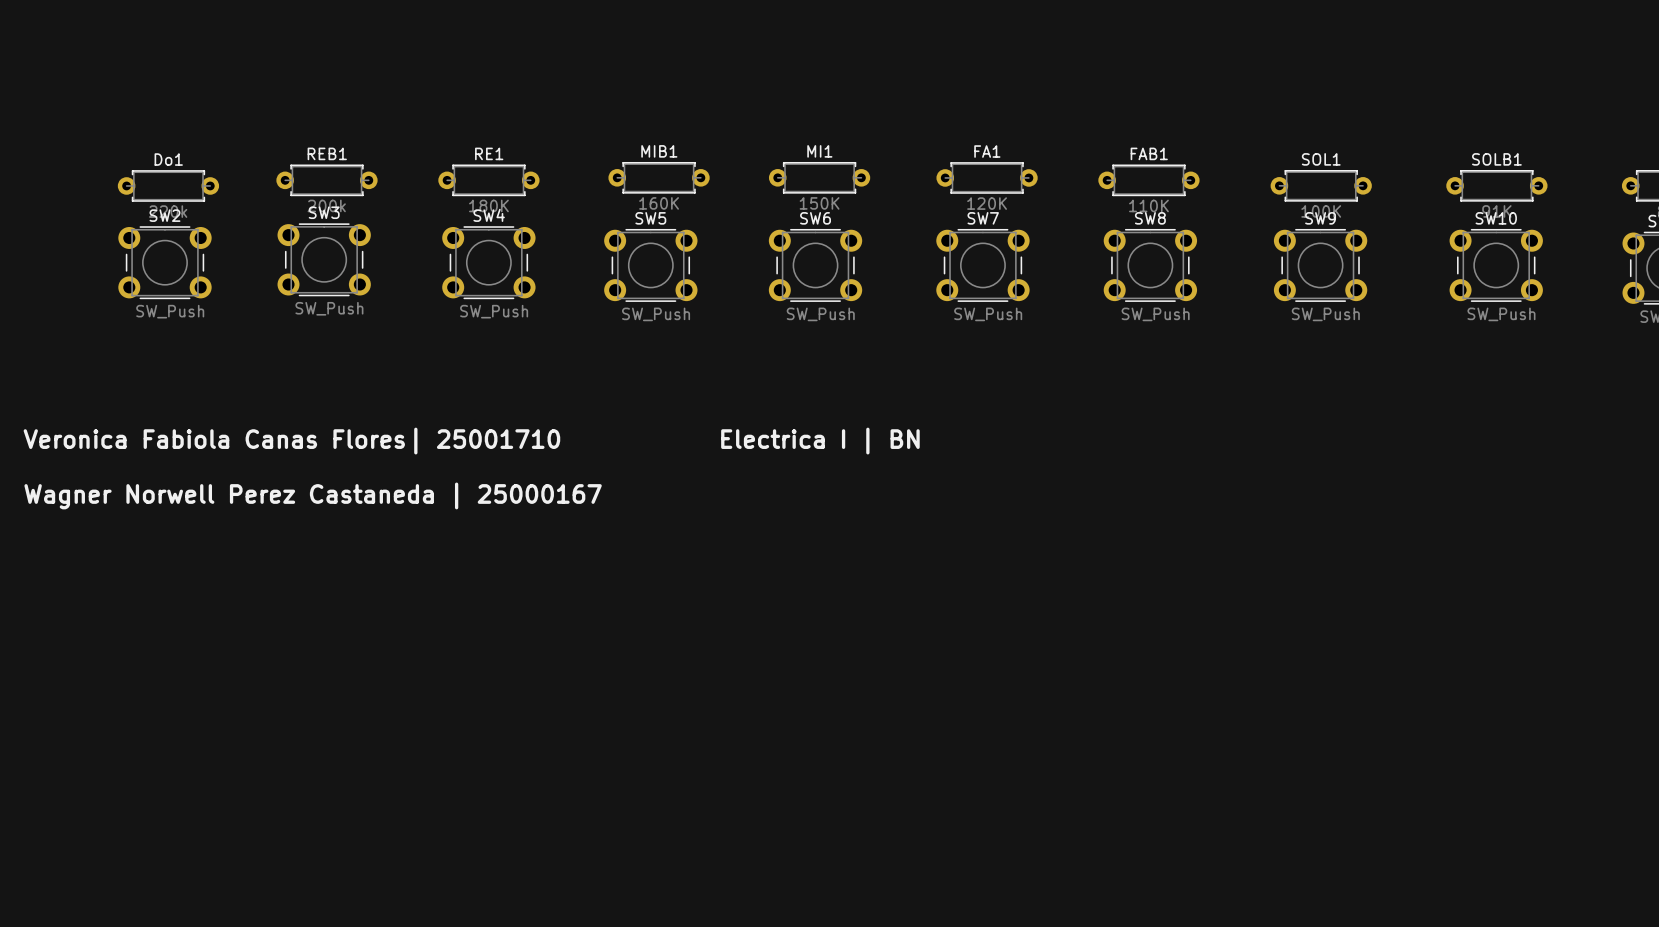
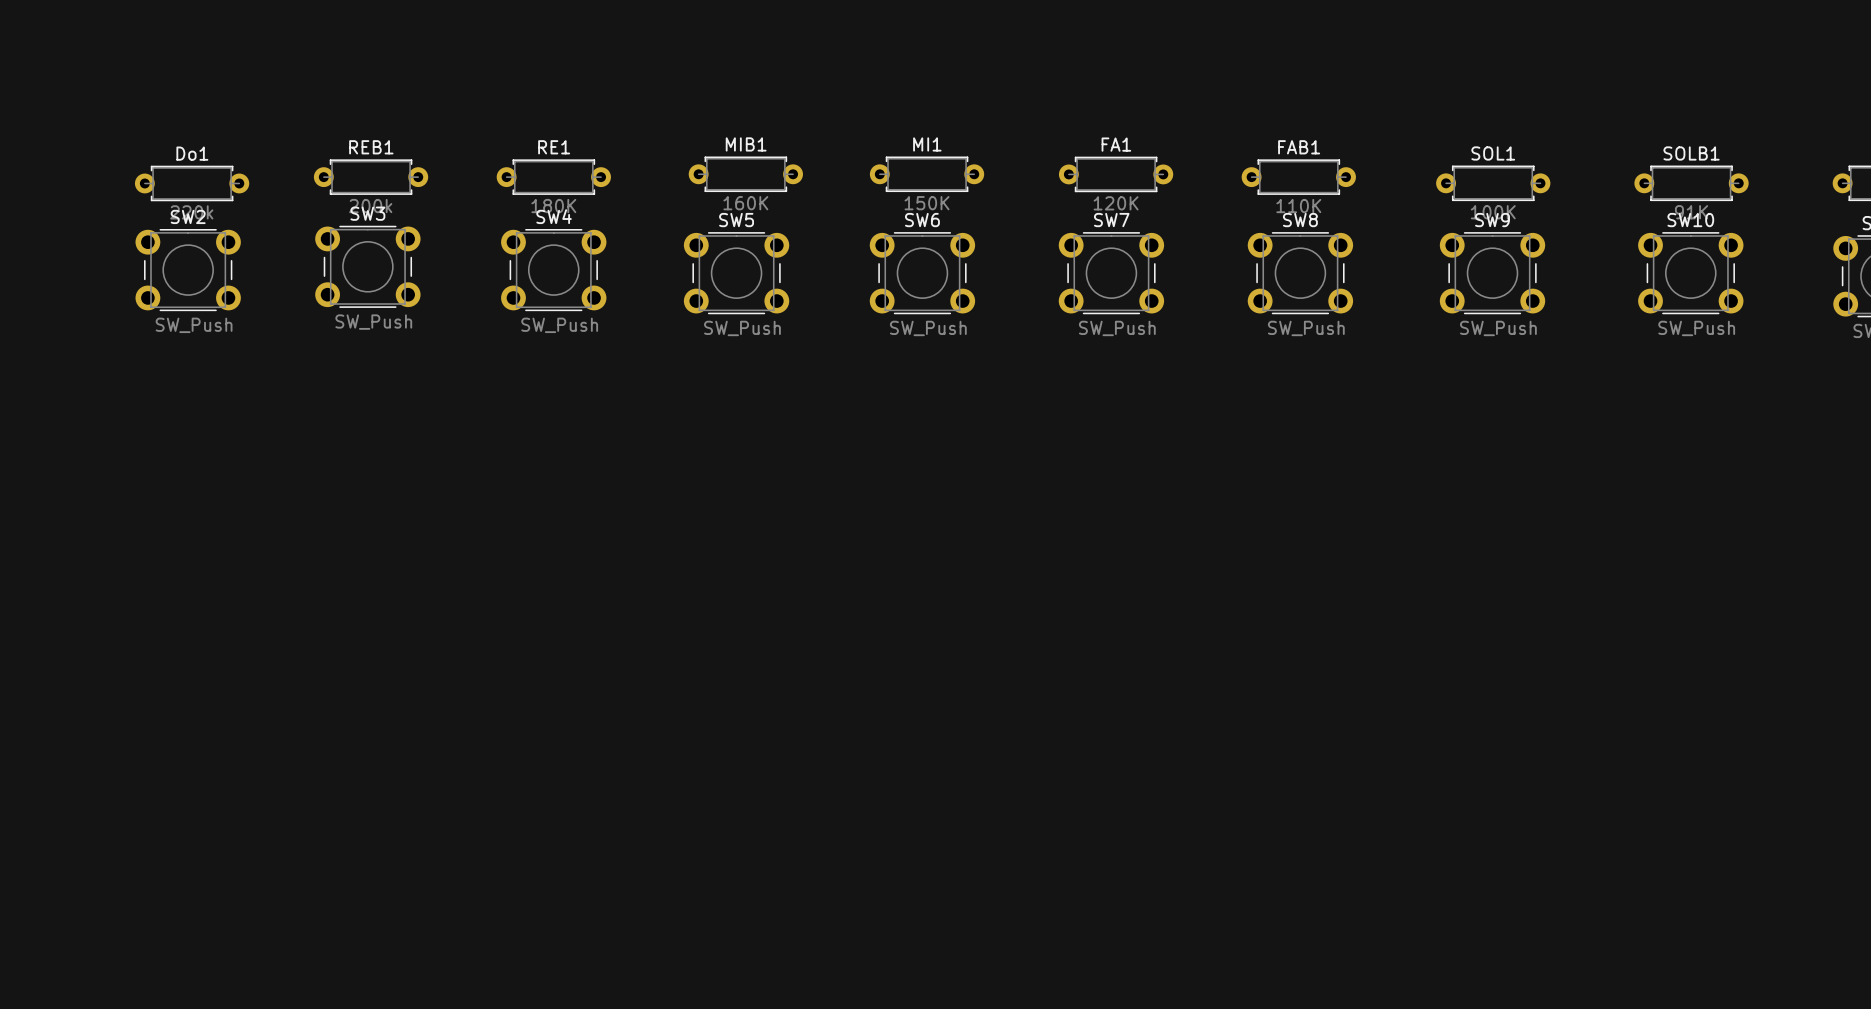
text: Veronica Fabiola Canas Flores (214, 439) -> none
text: | 25001710 (487, 441) -> none
text: Electrica I | BN (820, 441) -> none
text: Wagner Norwell Perez Castaneda | 25000167 (313, 495) -> none

